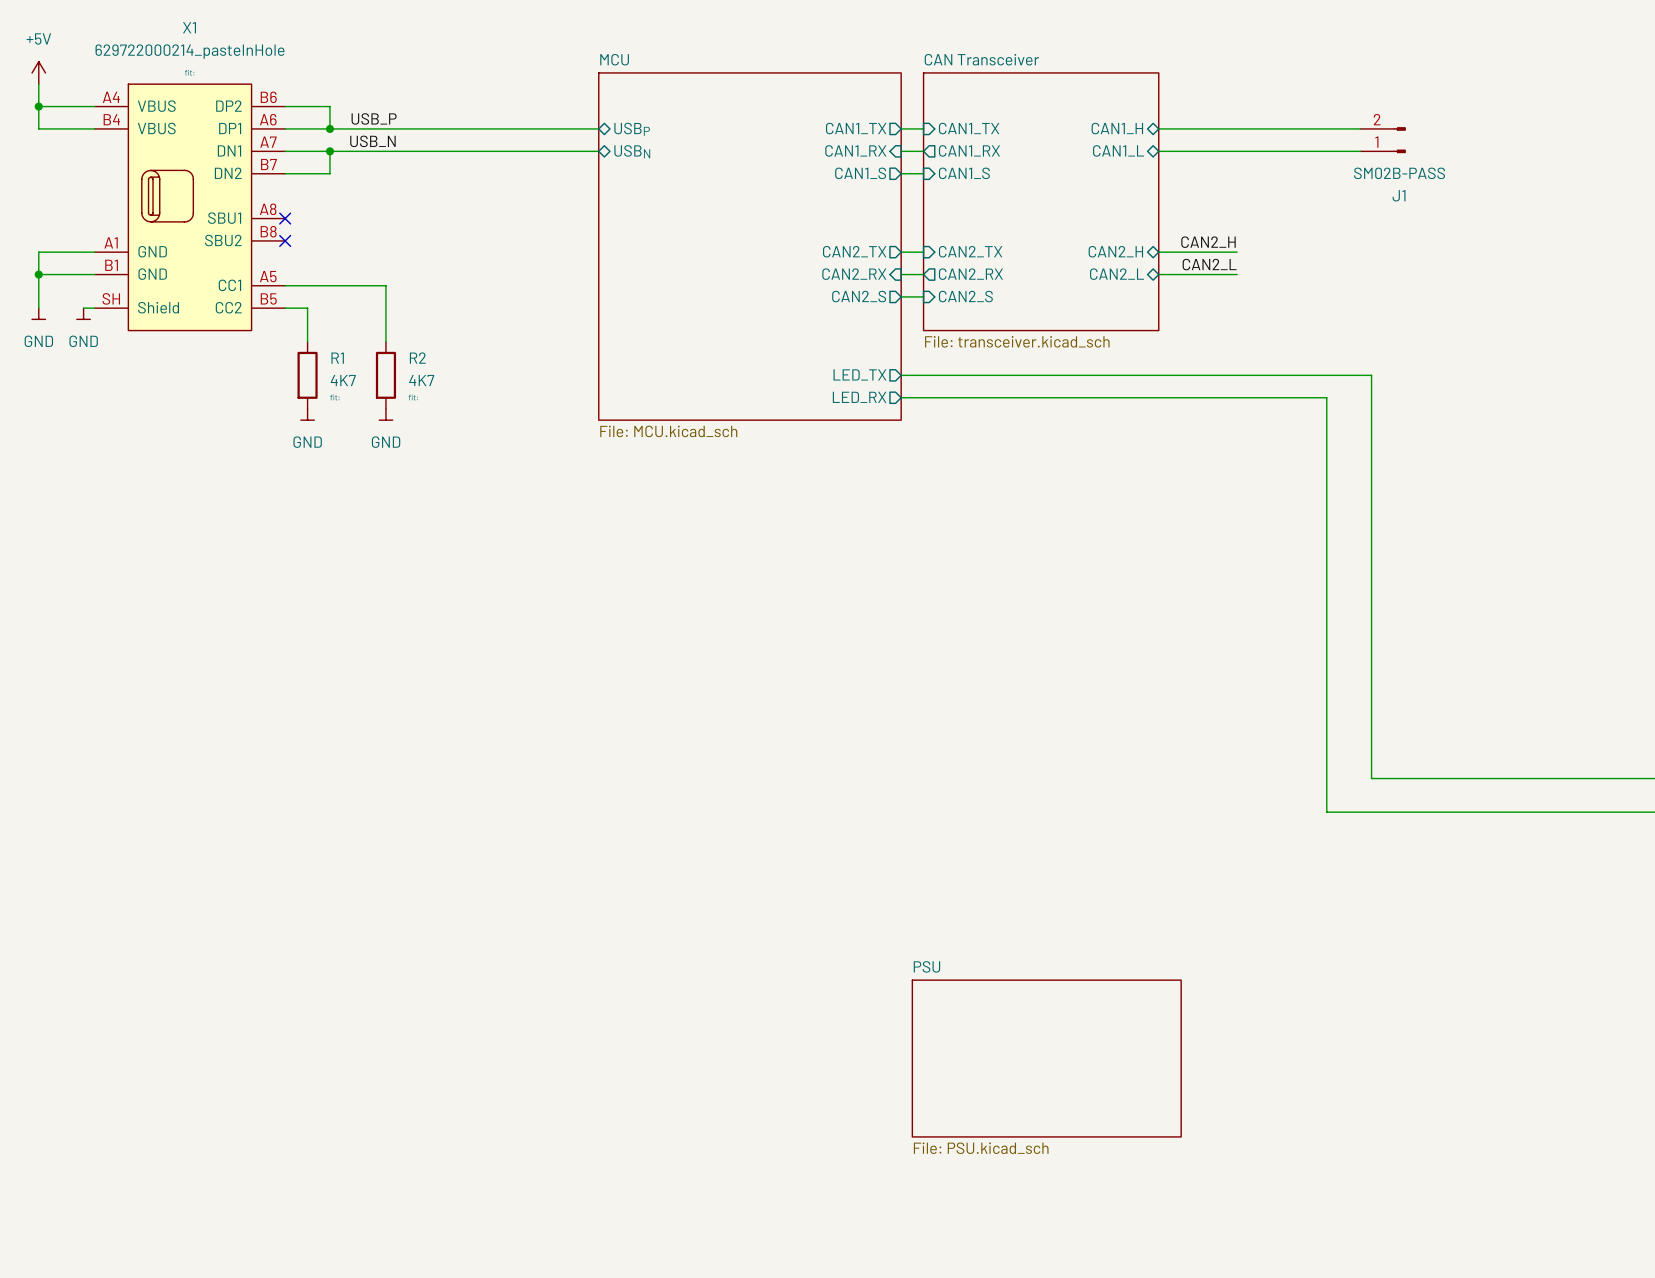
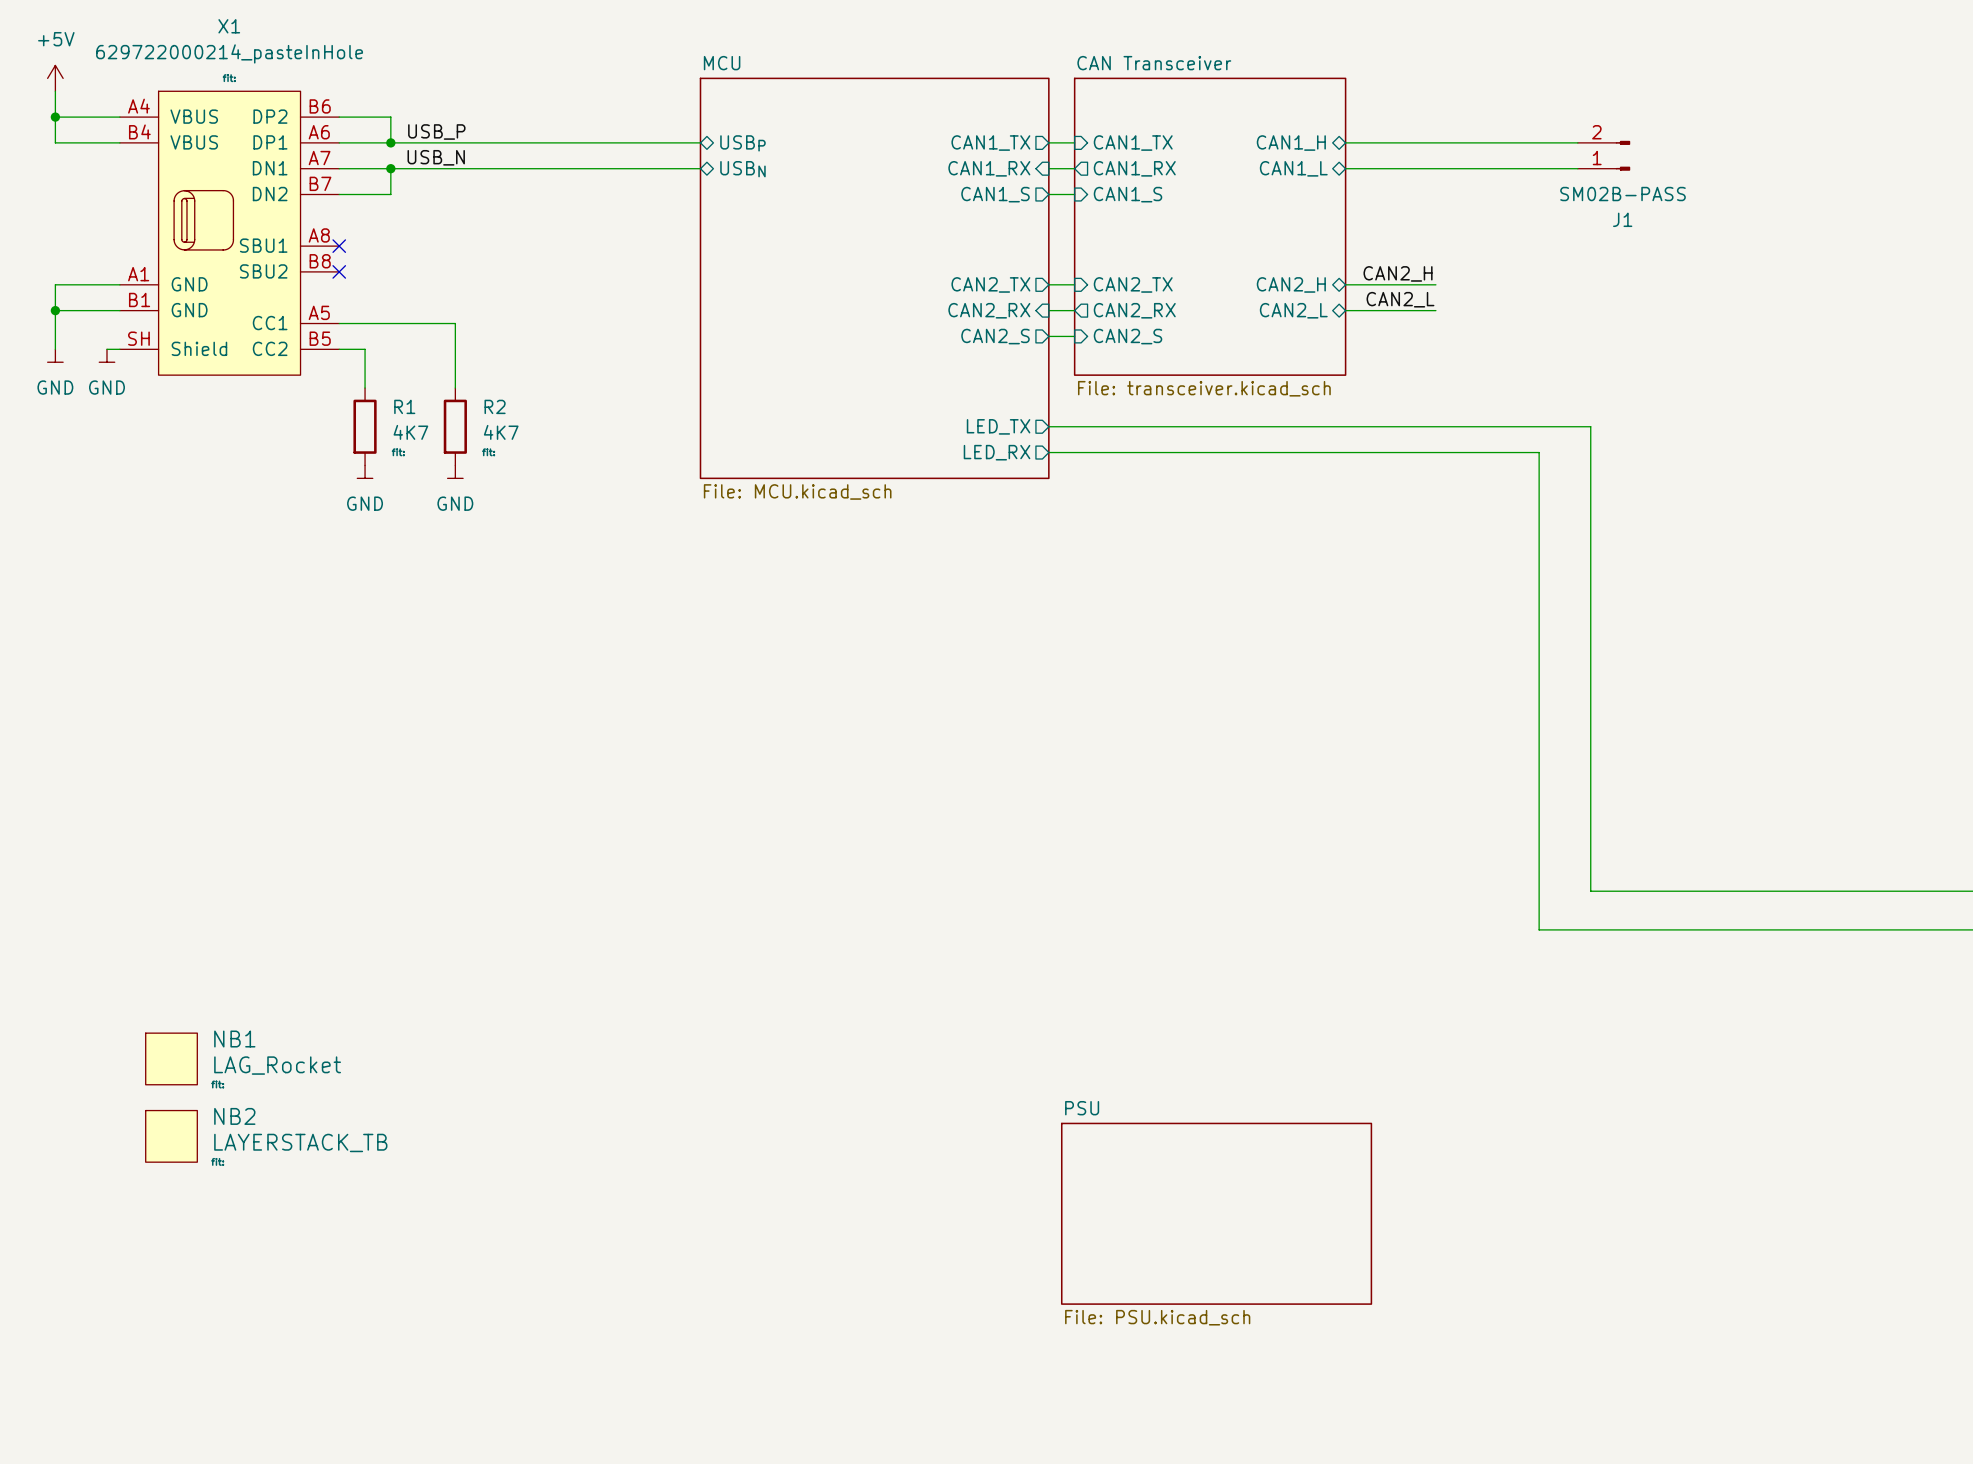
NB1: none -> LAG_Rocket (171, 1058)
NB2: none -> LAYERSTACK_TB (171, 1136)

